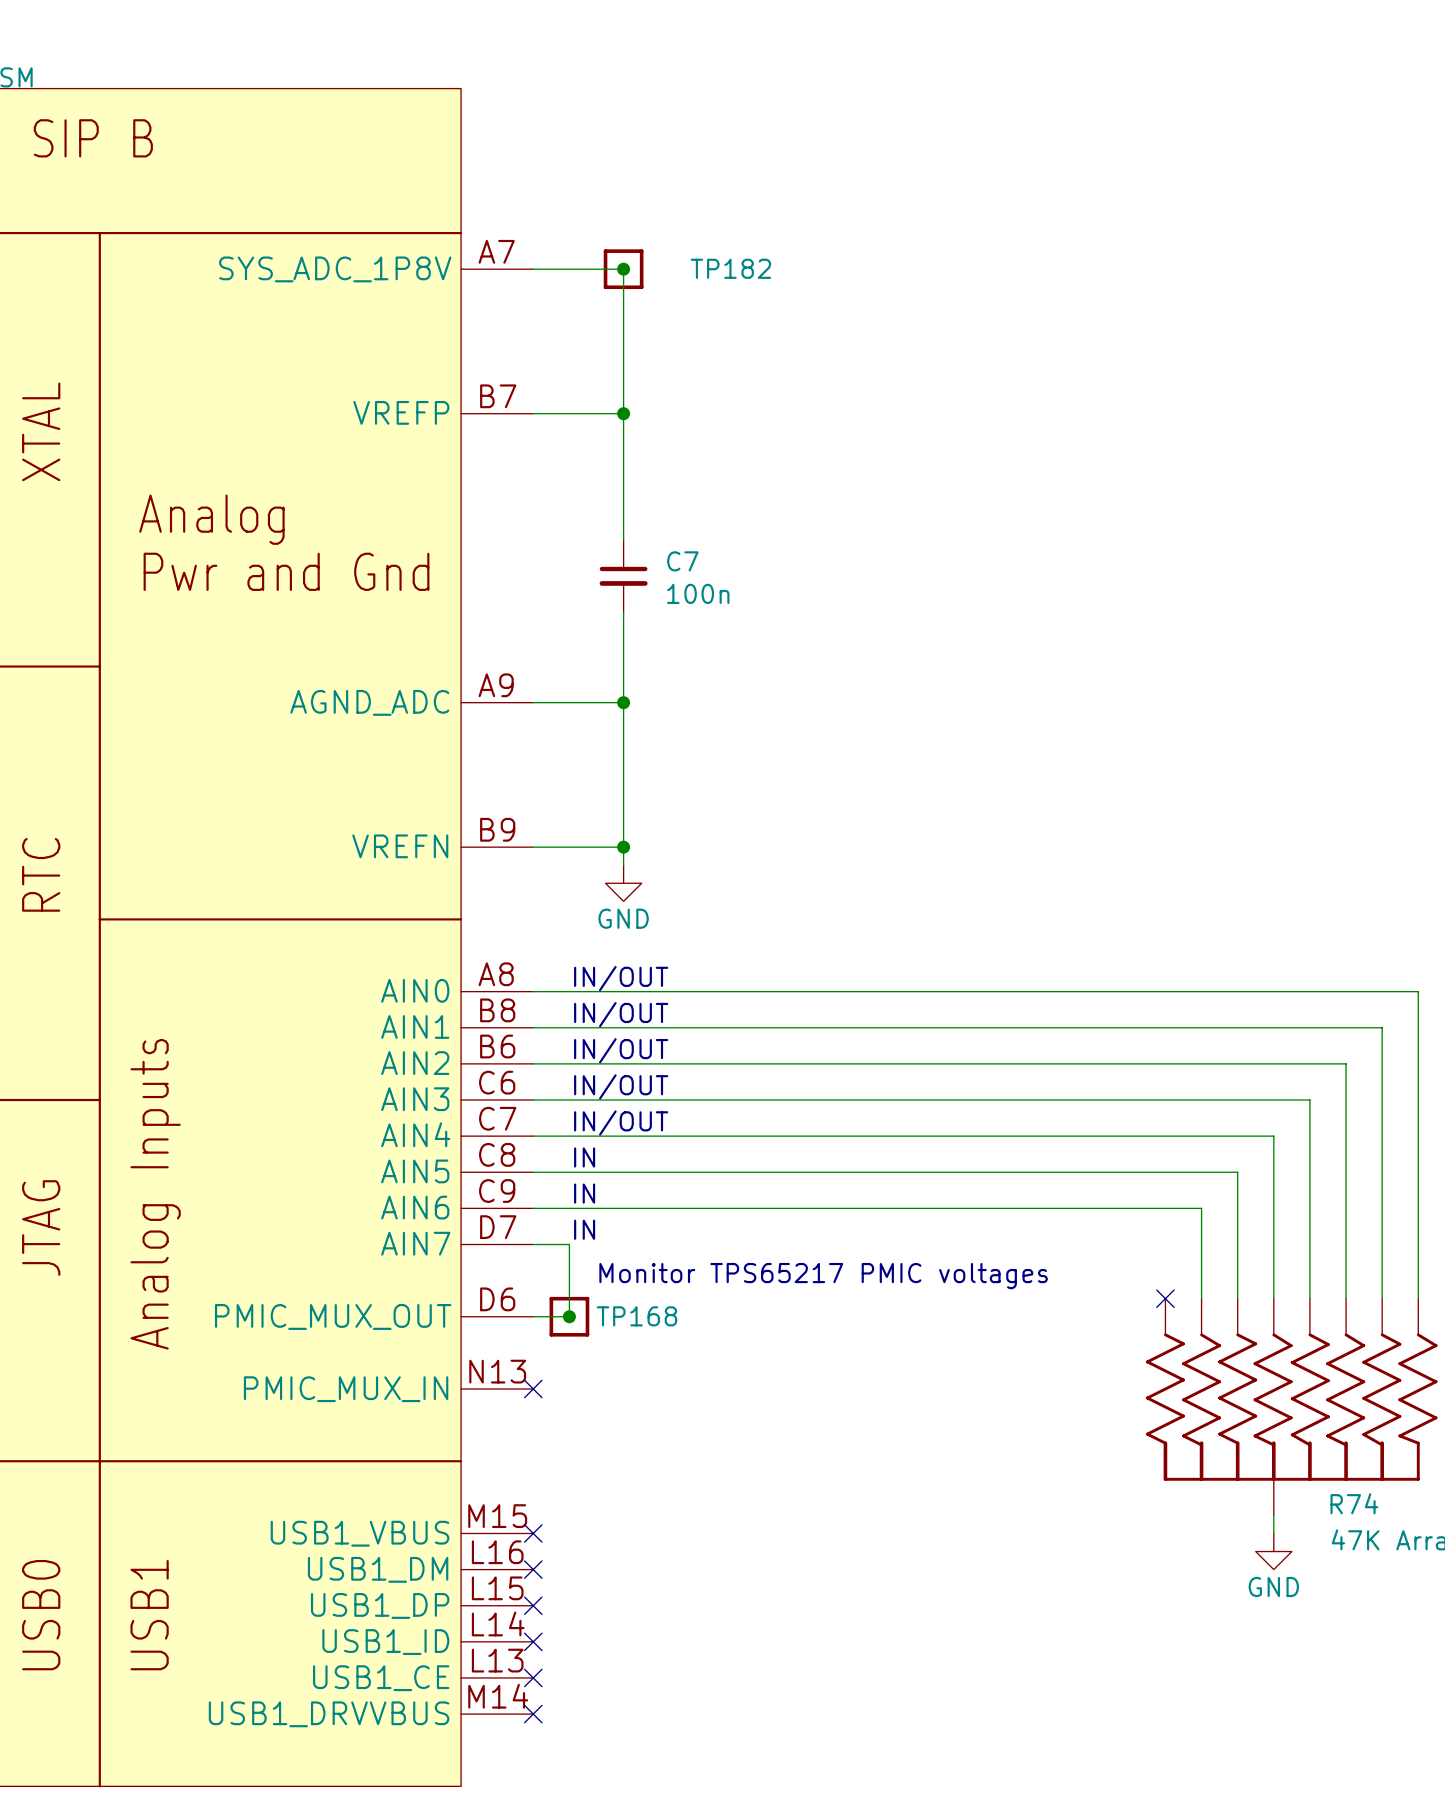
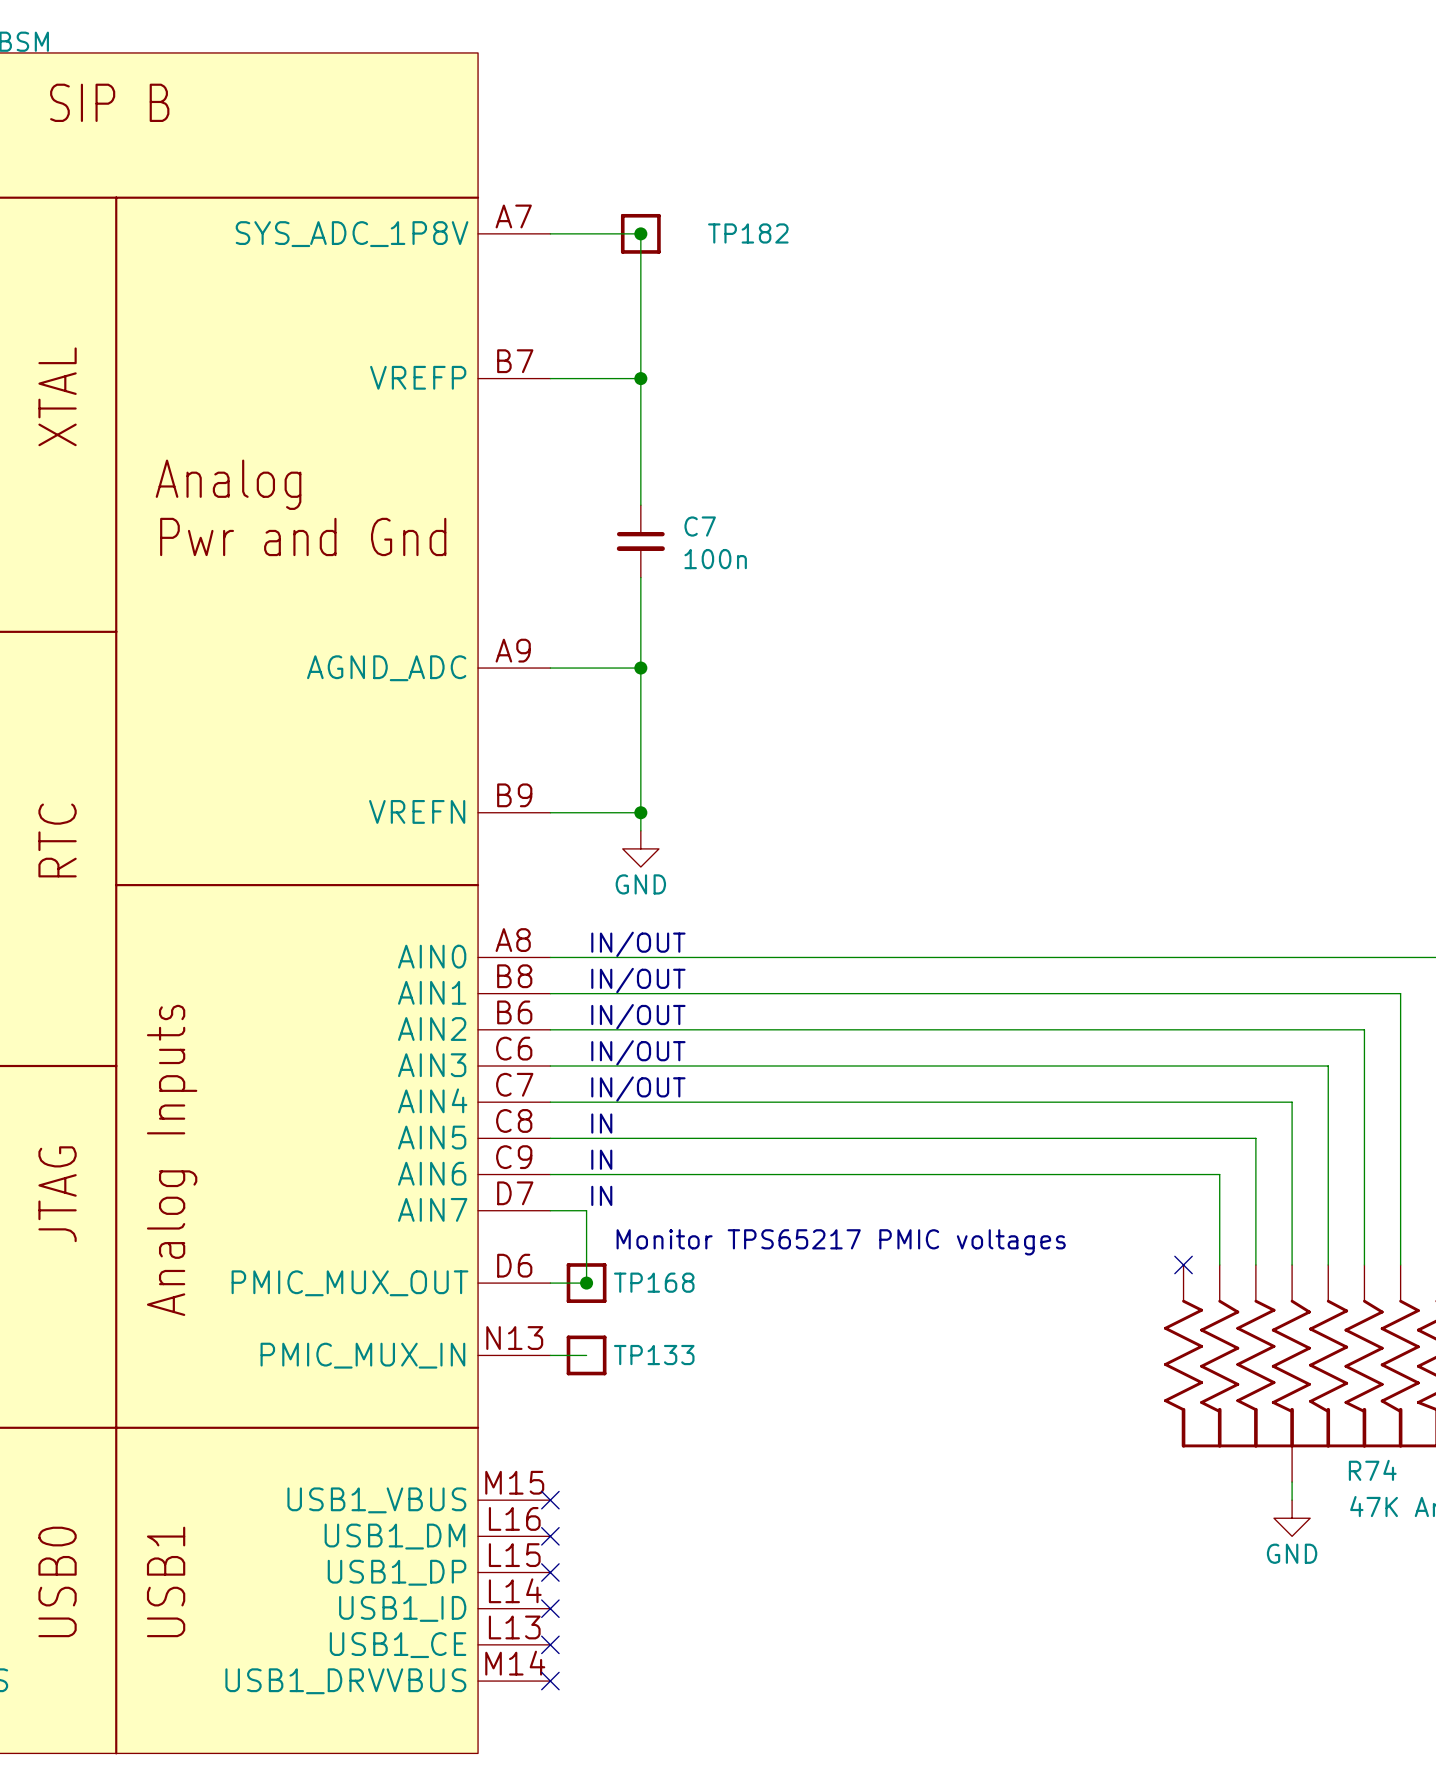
wire: none -> (550, 1355) (586, 1355)
no-connect mark: (533, 1388) -> none
TP133: none -> (586, 1355)

